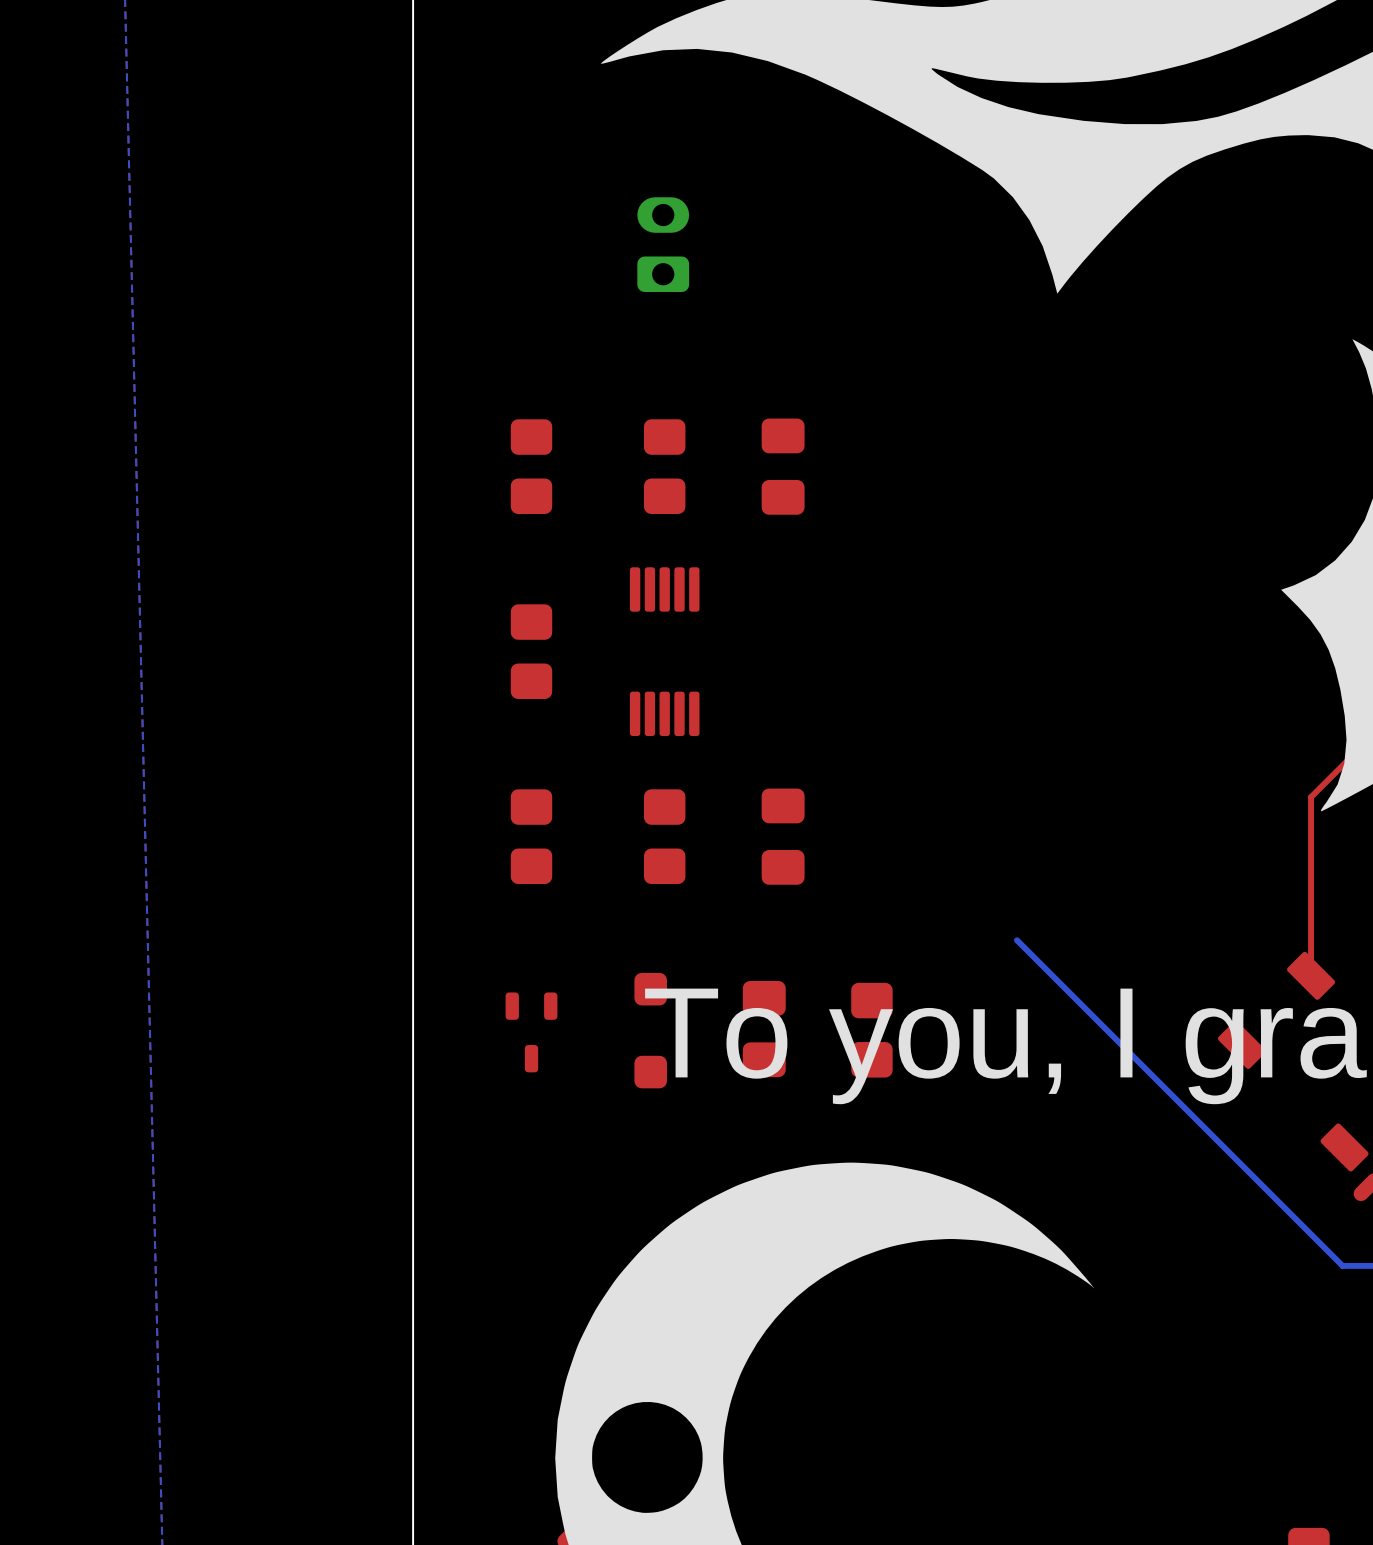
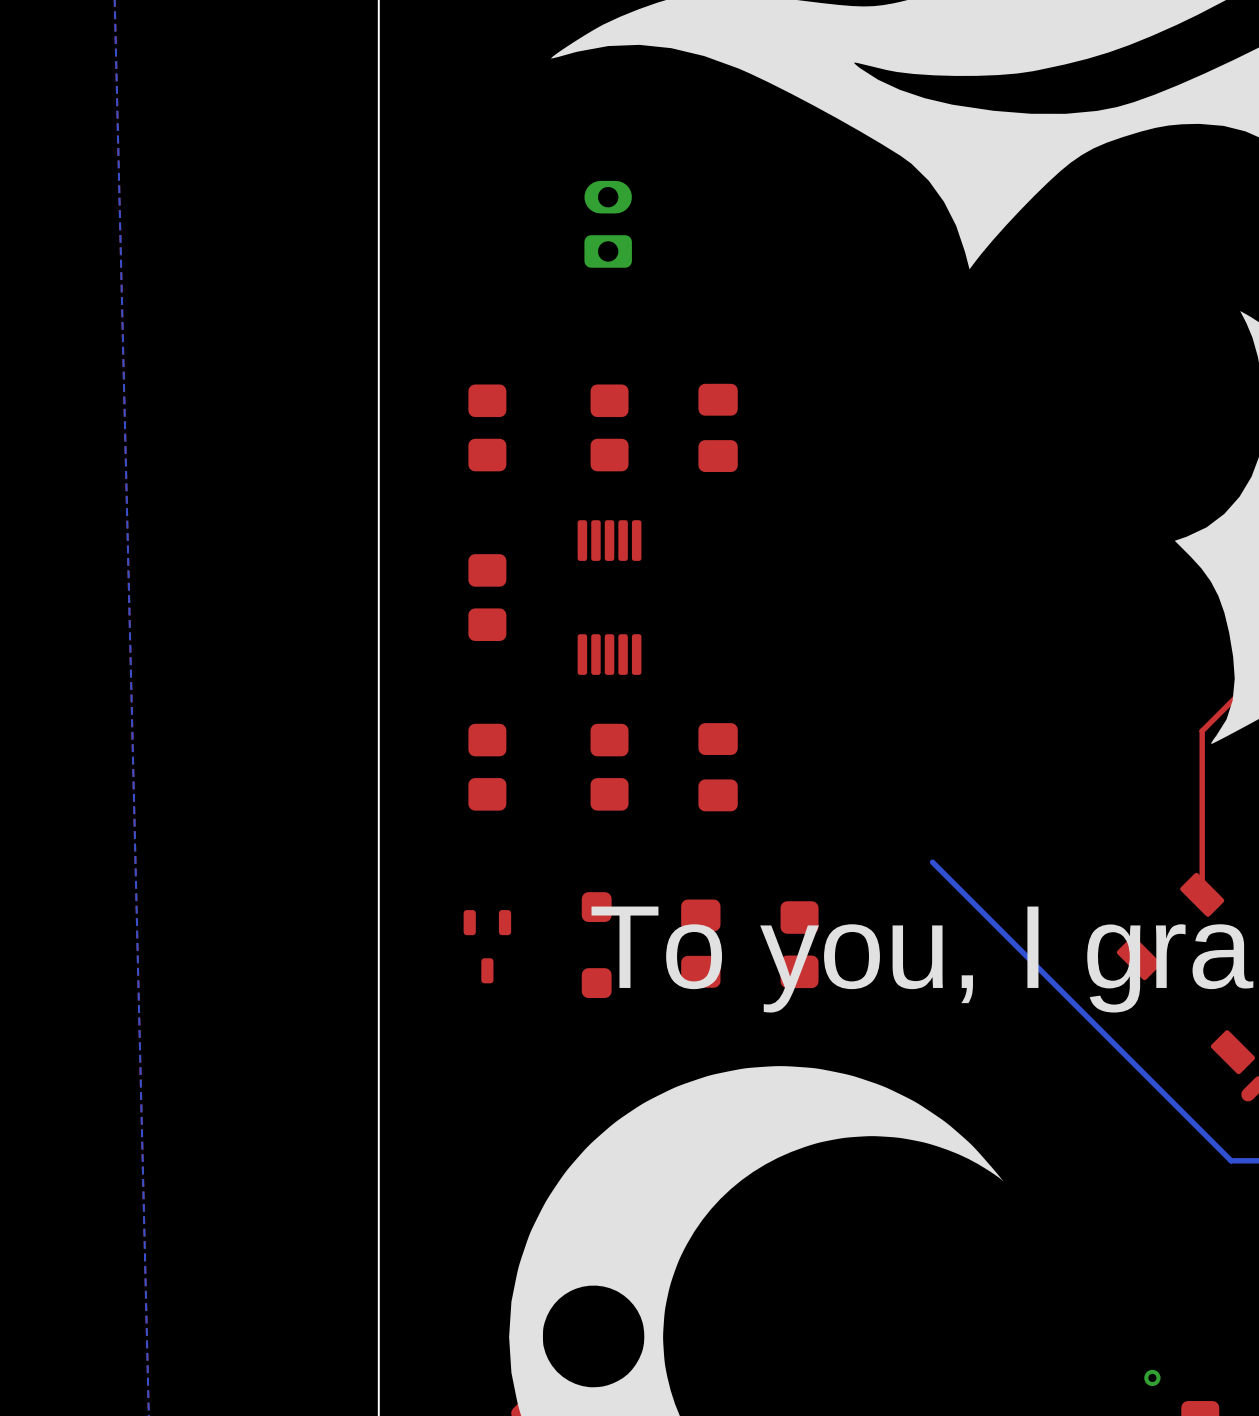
via: none -> (1152, 1377)

